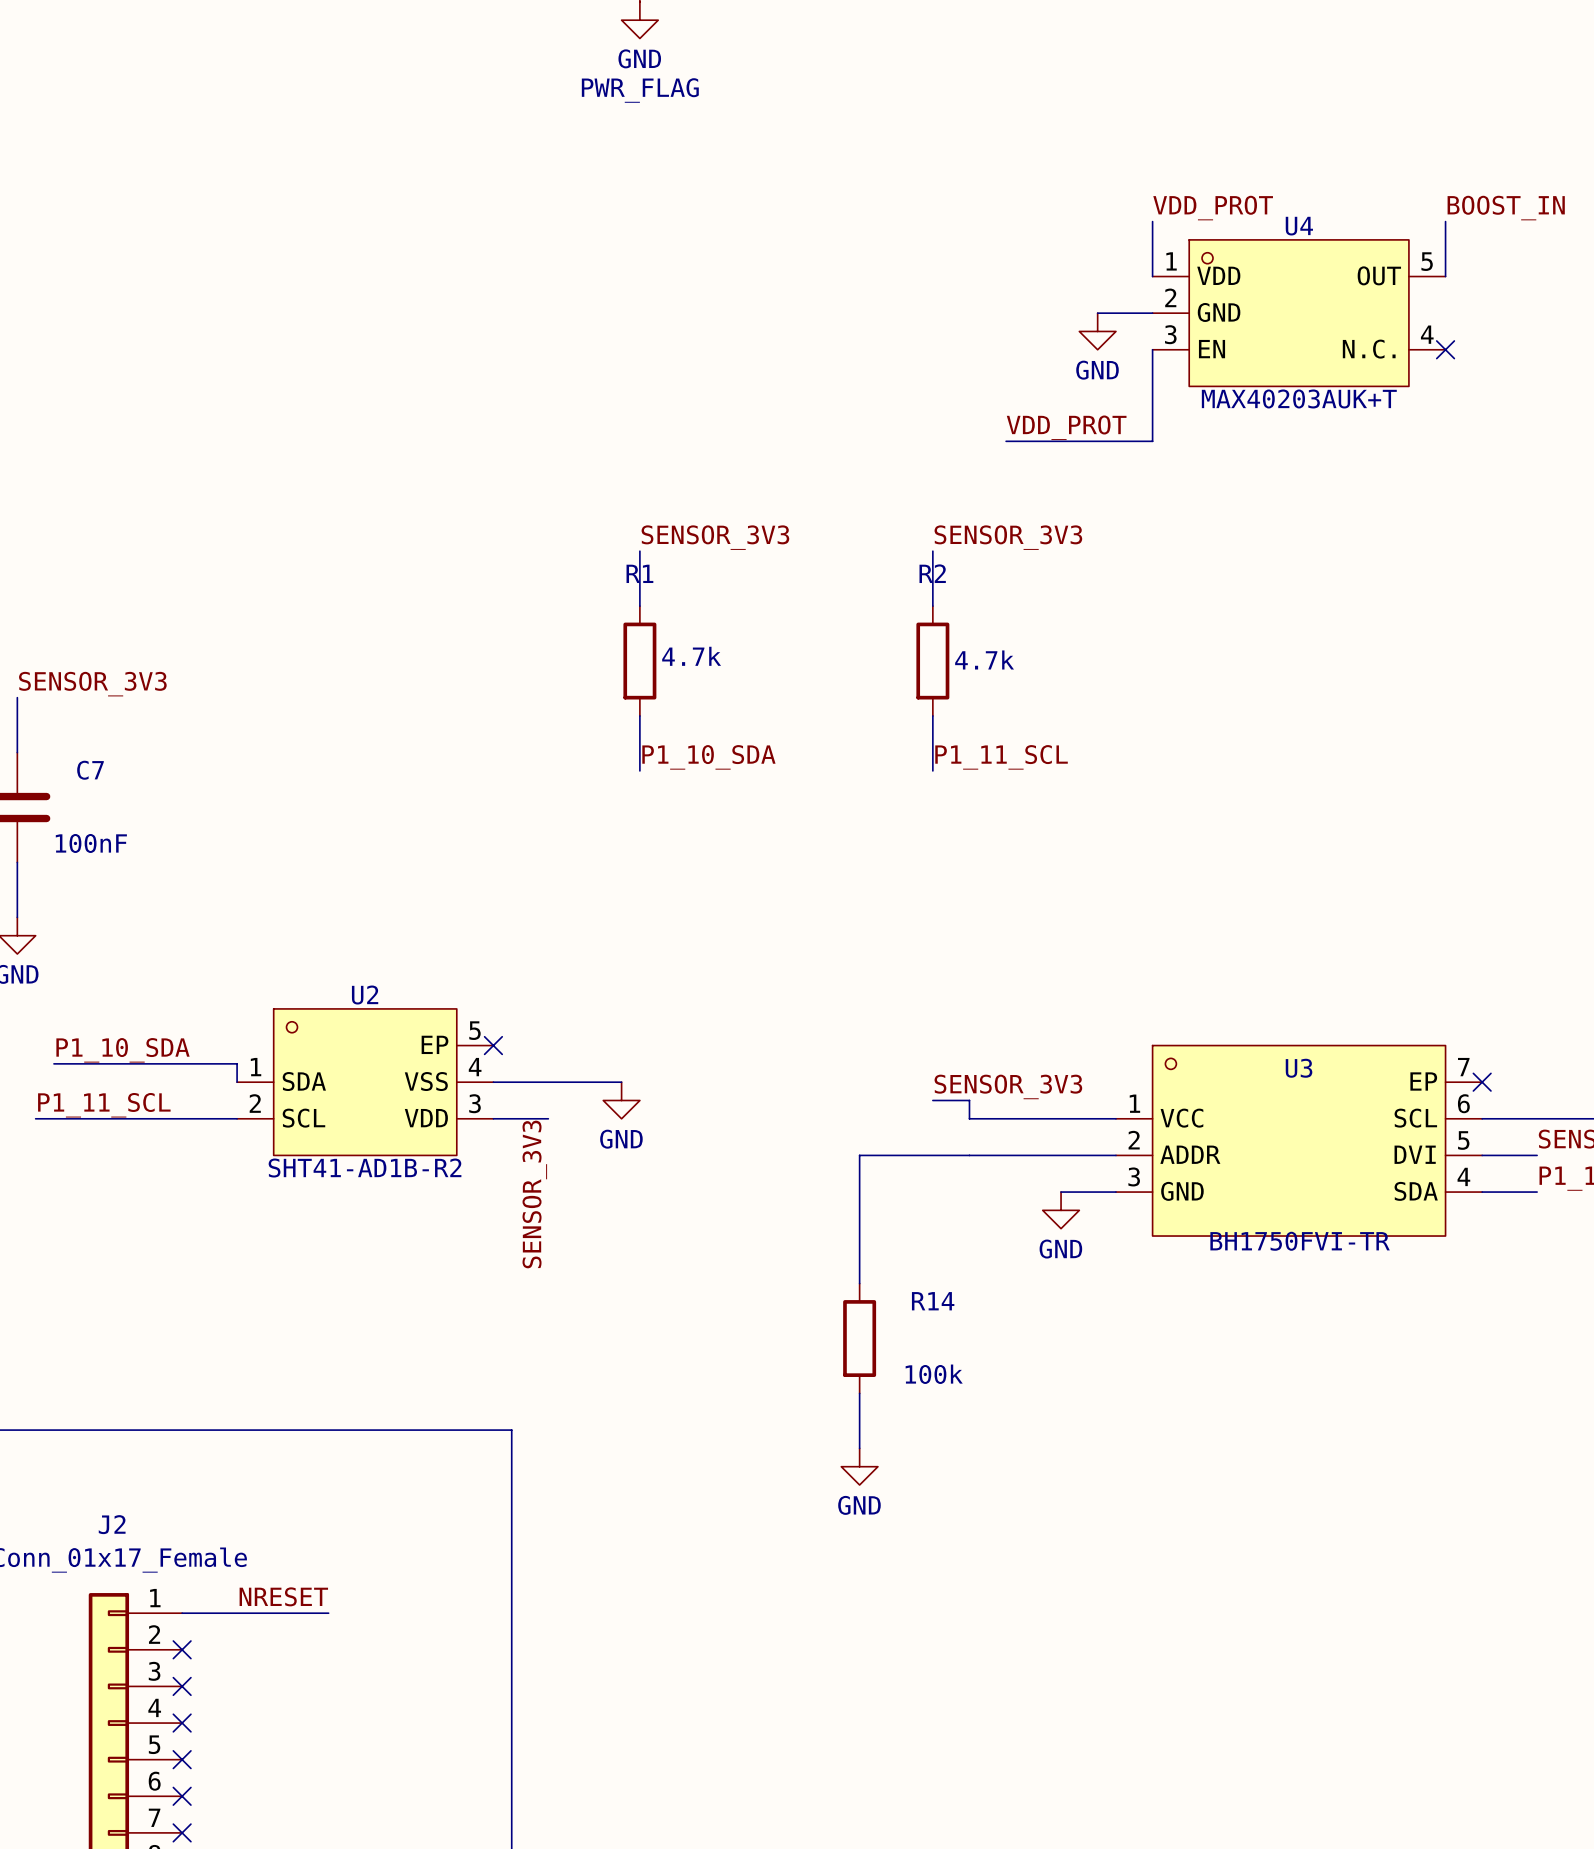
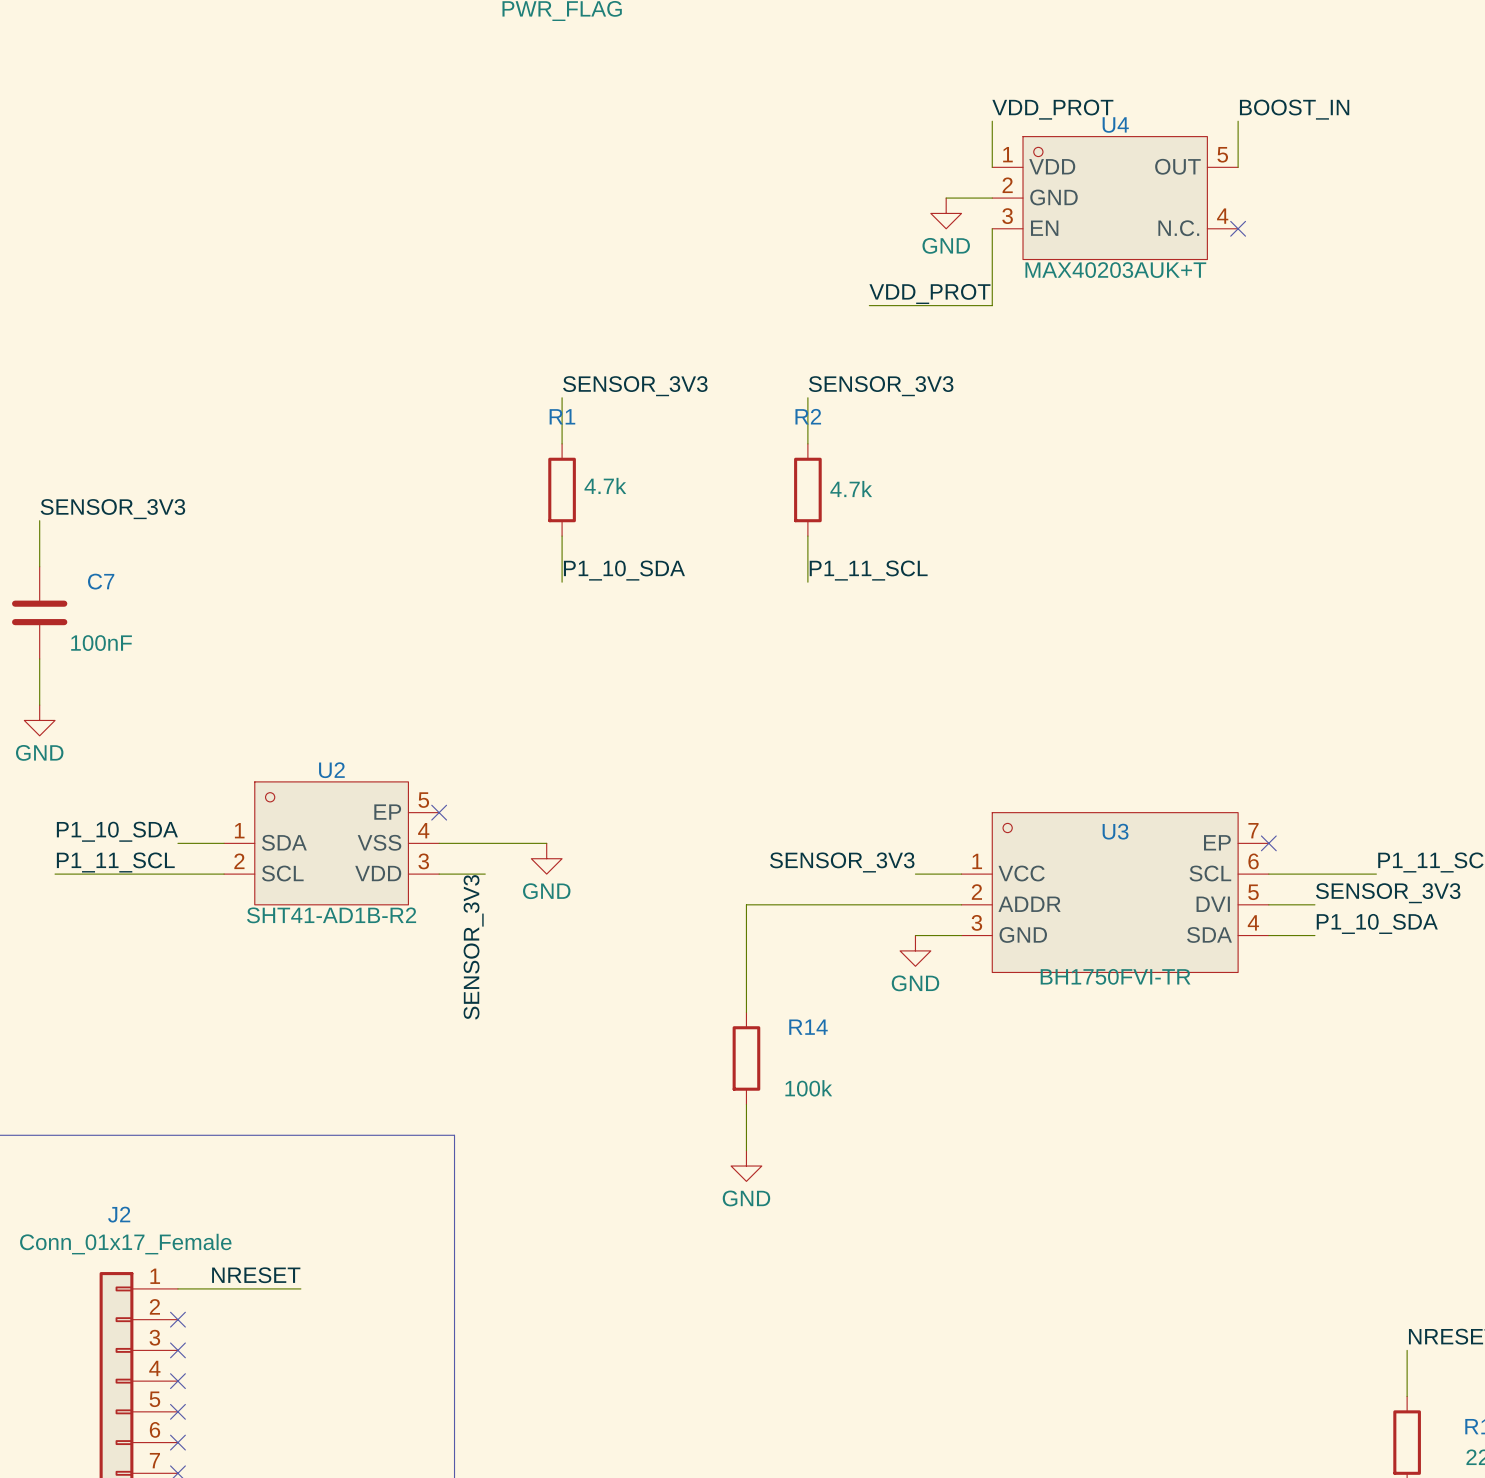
label position: P1_10_SDA (122, 1050) -> P1_10_SDA (117, 831)
wire: (53, 1063) (237, 1063) (237, 1082) -> (177, 843) (224, 843)
label position: SENSOR_3V3 (1008, 1086) -> SENSOR_3V3 (842, 862)
wire: (932, 1100) (969, 1100) (969, 1118) (1061, 1118) -> none

